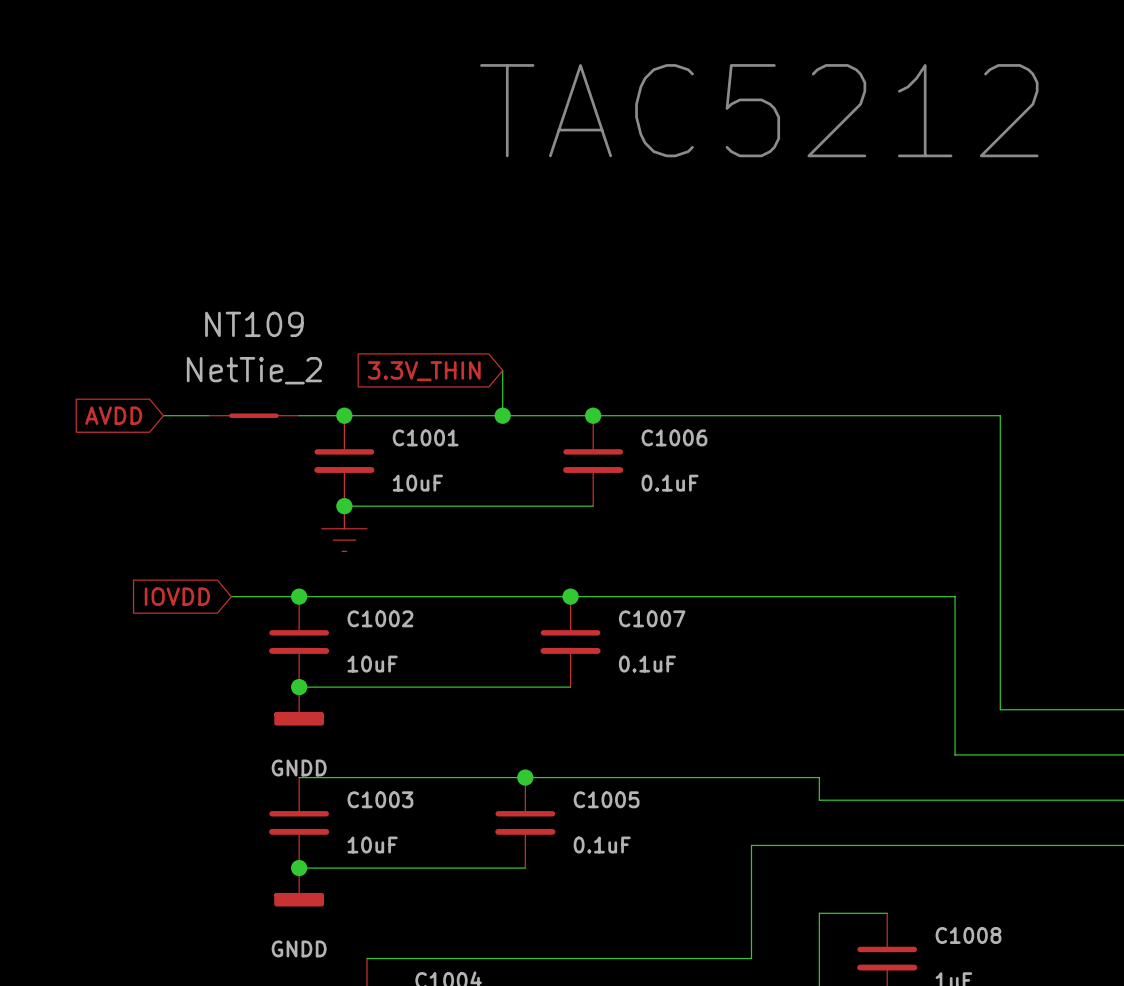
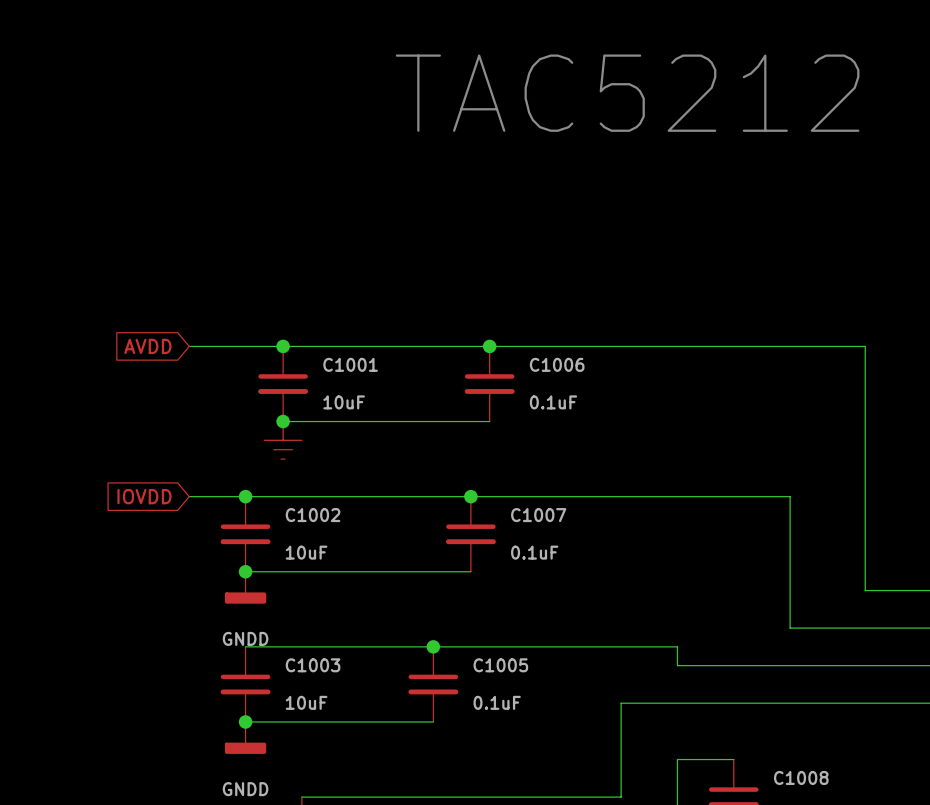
wire: (502, 370) (502, 415) -> none
global label: 3.3V_THIN (424, 371) -> none
global label position: AVDD (113, 415) -> AVDD (147, 346)
wire: (163, 415) (208, 415) -> none
NT109: NetTie_2 (253, 415) -> none
junction: (502, 415) -> none
wire: (1000, 415) (1000, 709) (1045, 709) -> (827, 346) (865, 346) (865, 590)

